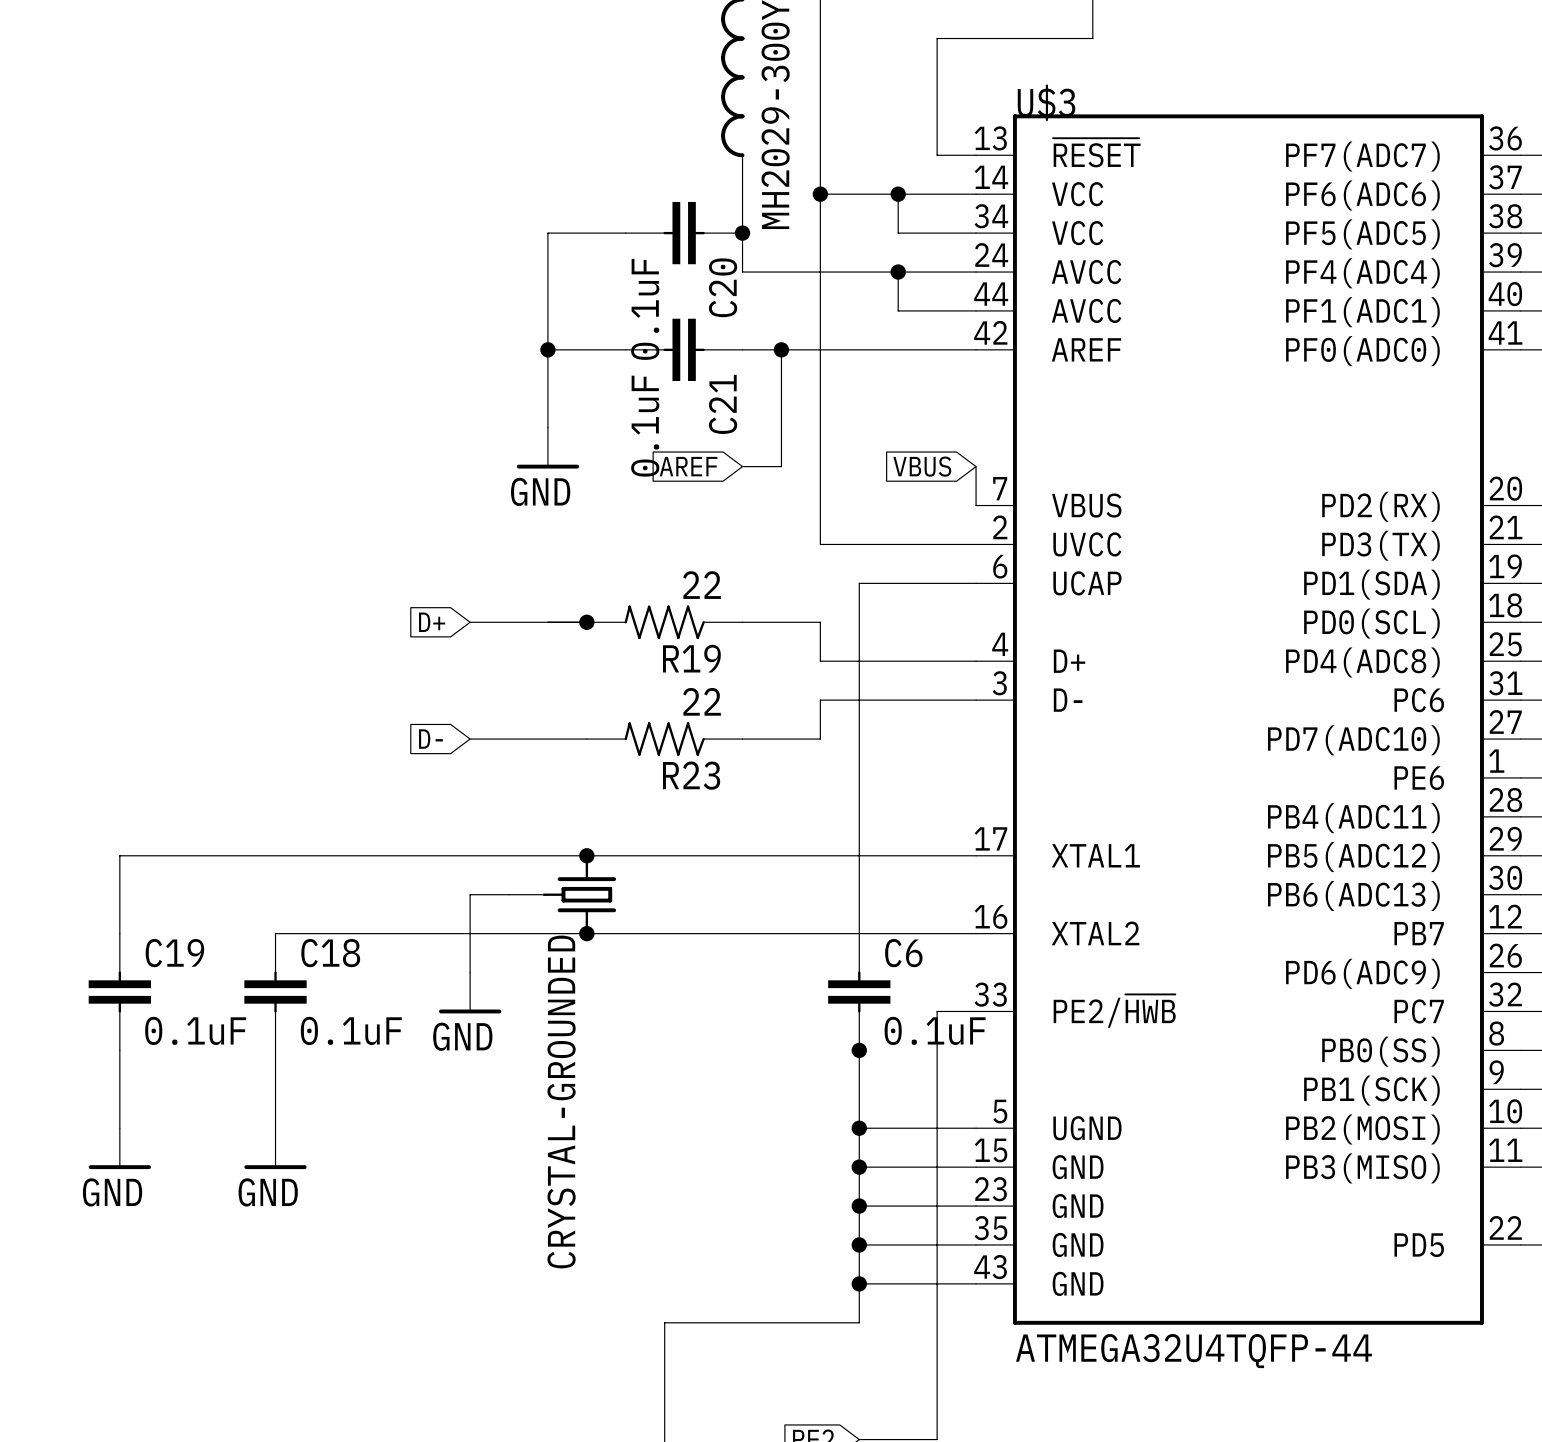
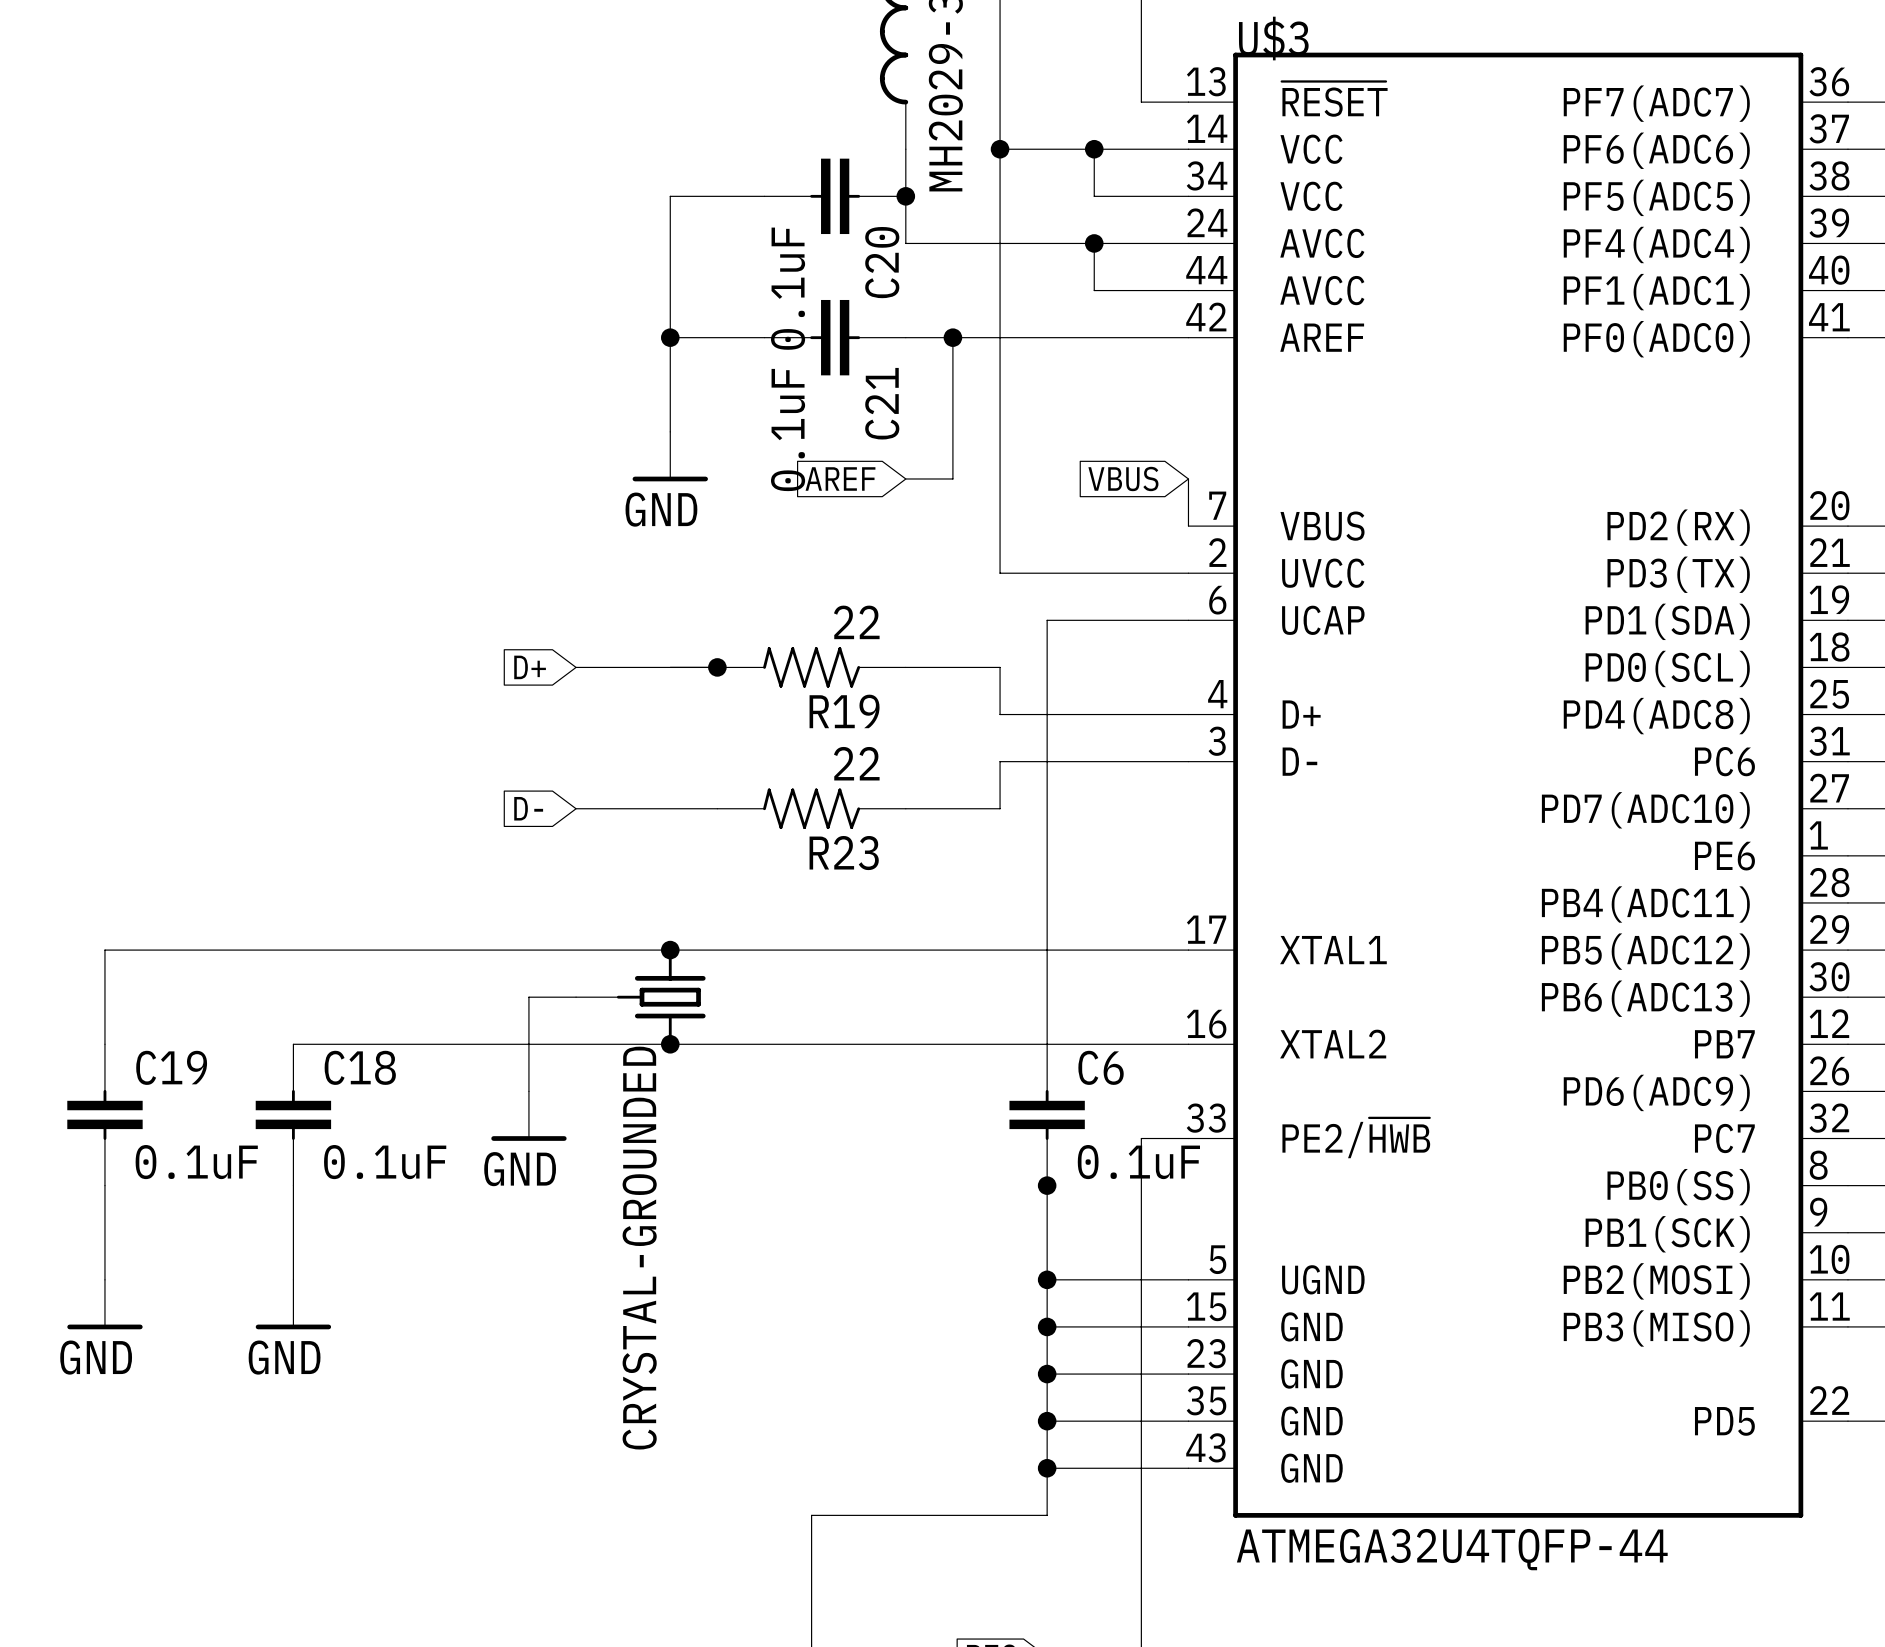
wire: (119, 855) (119, 933) -> (152, 950) (104, 950) (104, 1044)
junction position: (586, 855) -> (670, 950)
wire: (509, 894) (470, 894) (470, 972) -> (576, 997) (528, 997) (528, 1091)
part position: (562, 894) -> (640, 997)
wire: none -> (293, 1044) (340, 1044)
junction position: (586, 933) -> (670, 1044)
C19 position: (119, 992) -> (104, 1114)
C18 position: (275, 992) -> (293, 1114)
power symbol position: GND (470, 992) -> GND (528, 1116)
wire: (119, 1050) (119, 1128) -> (104, 1185) (104, 1279)
wire: (275, 1050) (275, 1128) -> (293, 1185) (293, 1279)
power symbol position: GND (119, 1148) -> GND (104, 1304)
power symbol position: GND (275, 1148) -> GND (293, 1304)

